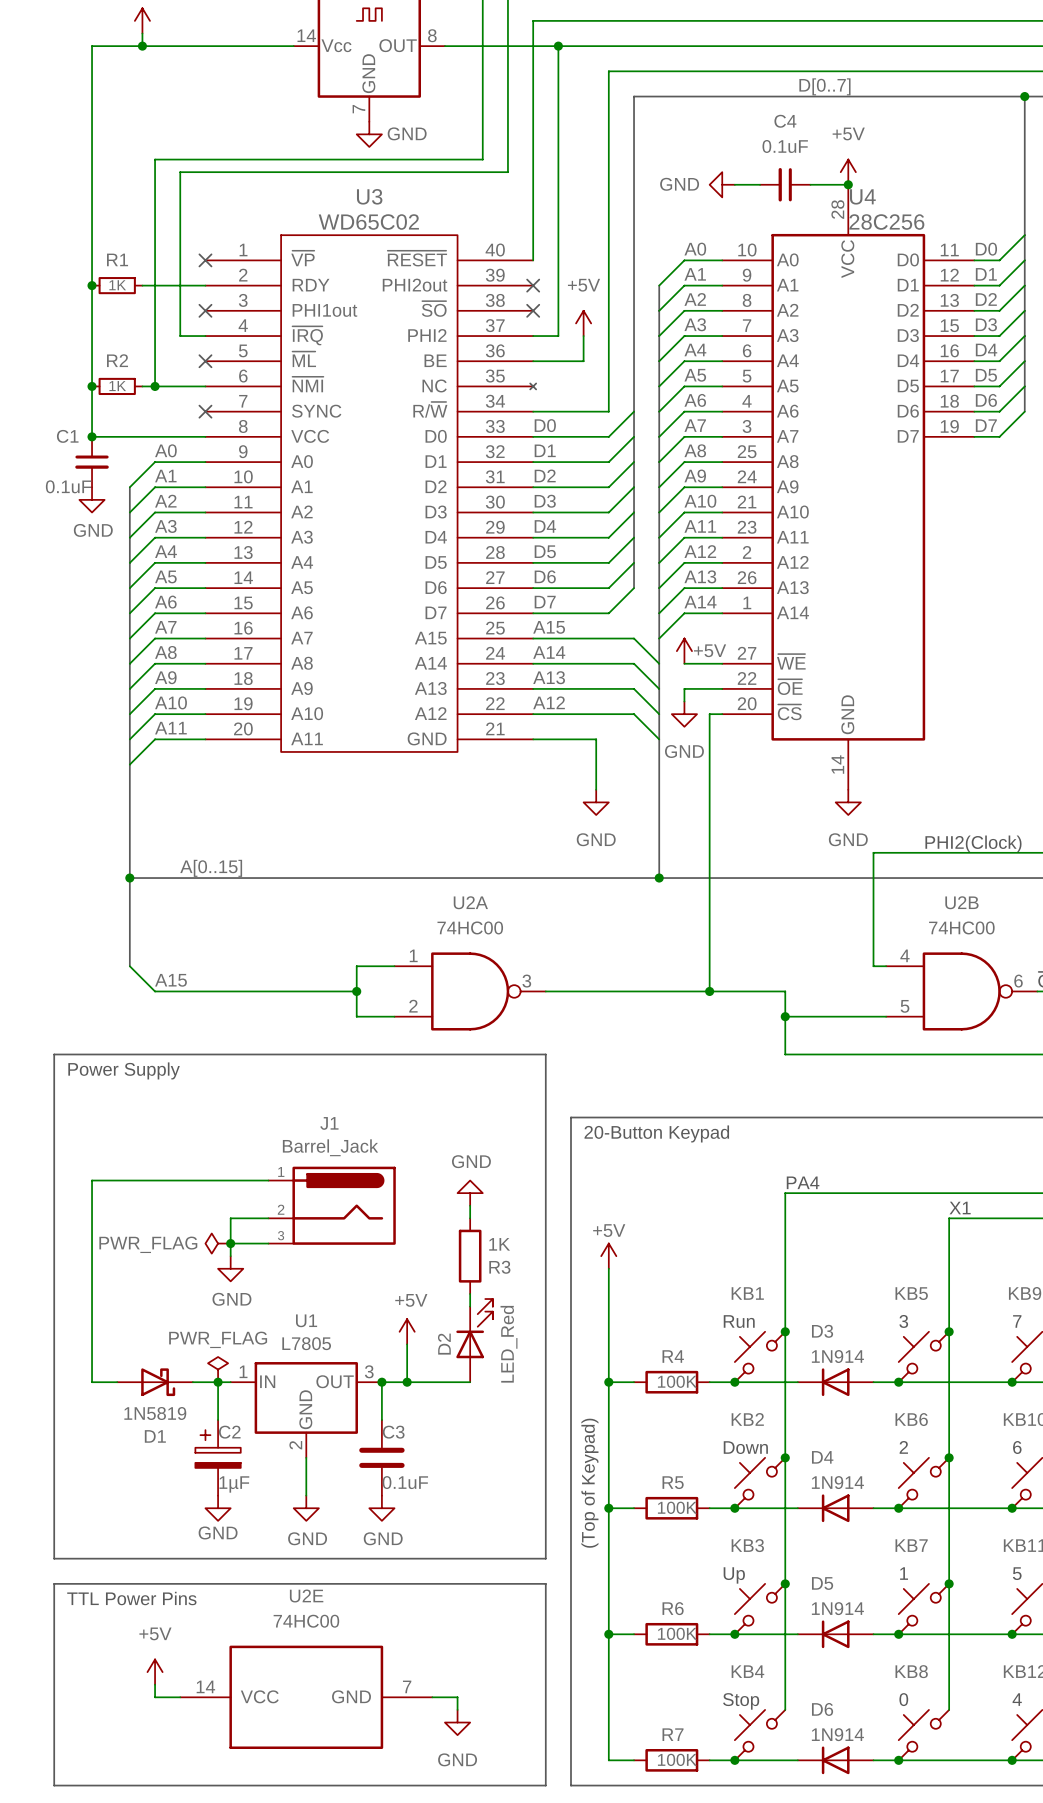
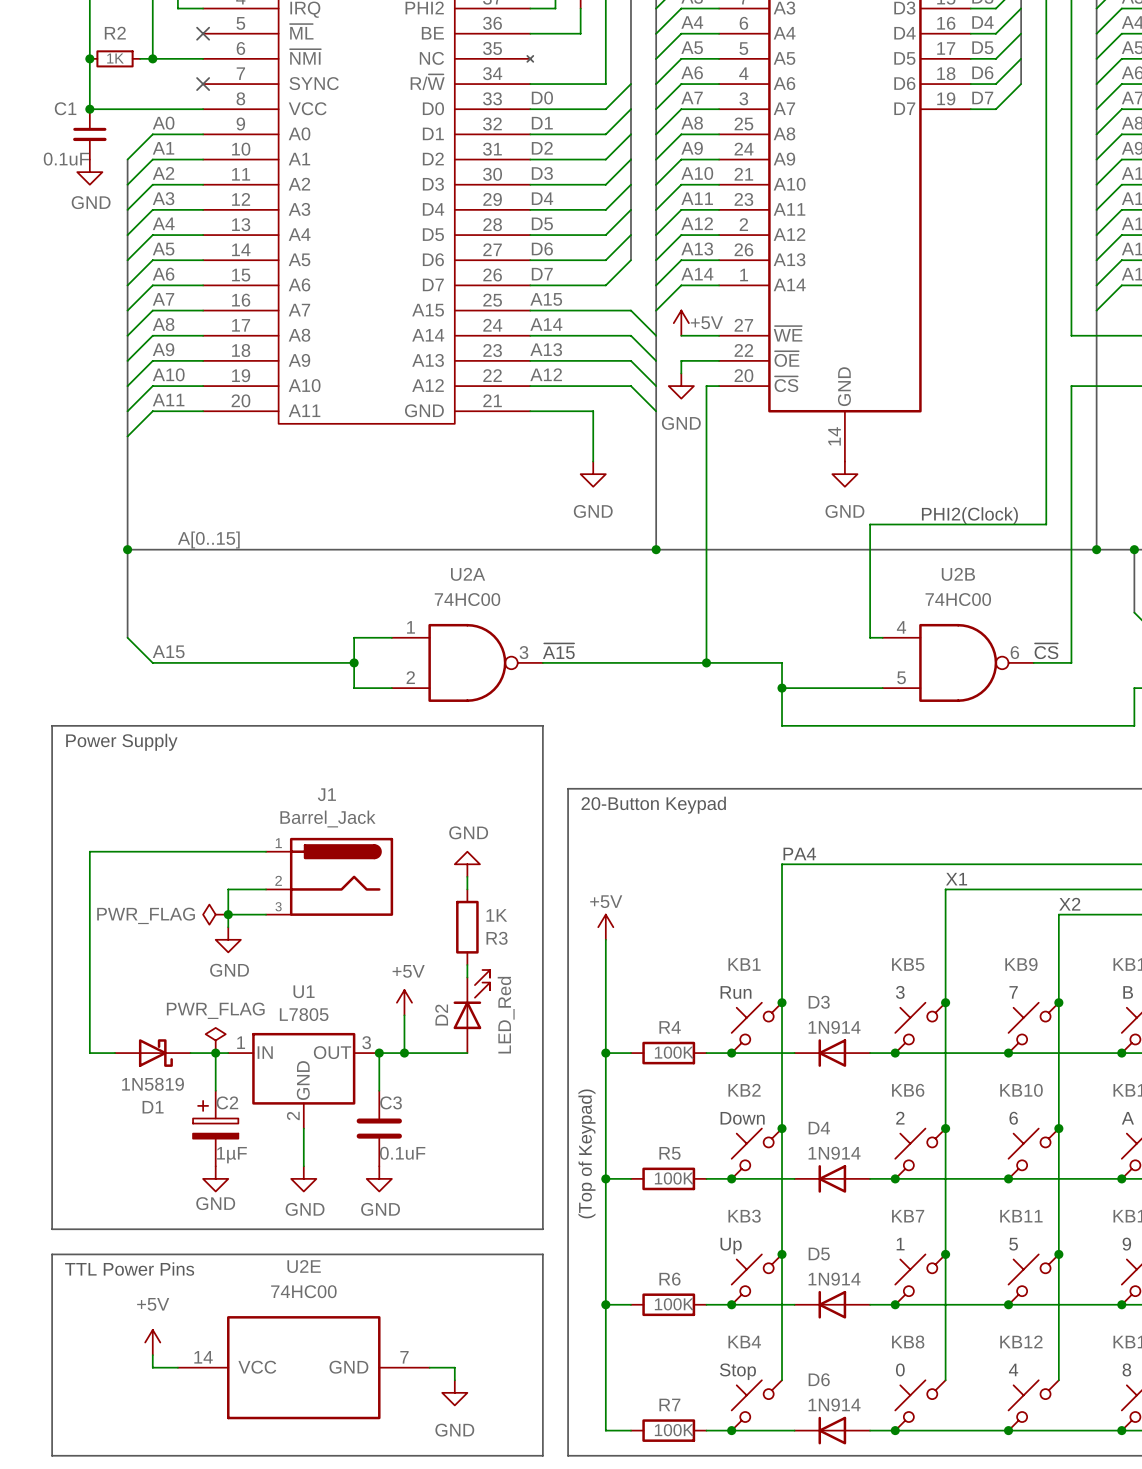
text: none -> ~{A15} (558, 651)

